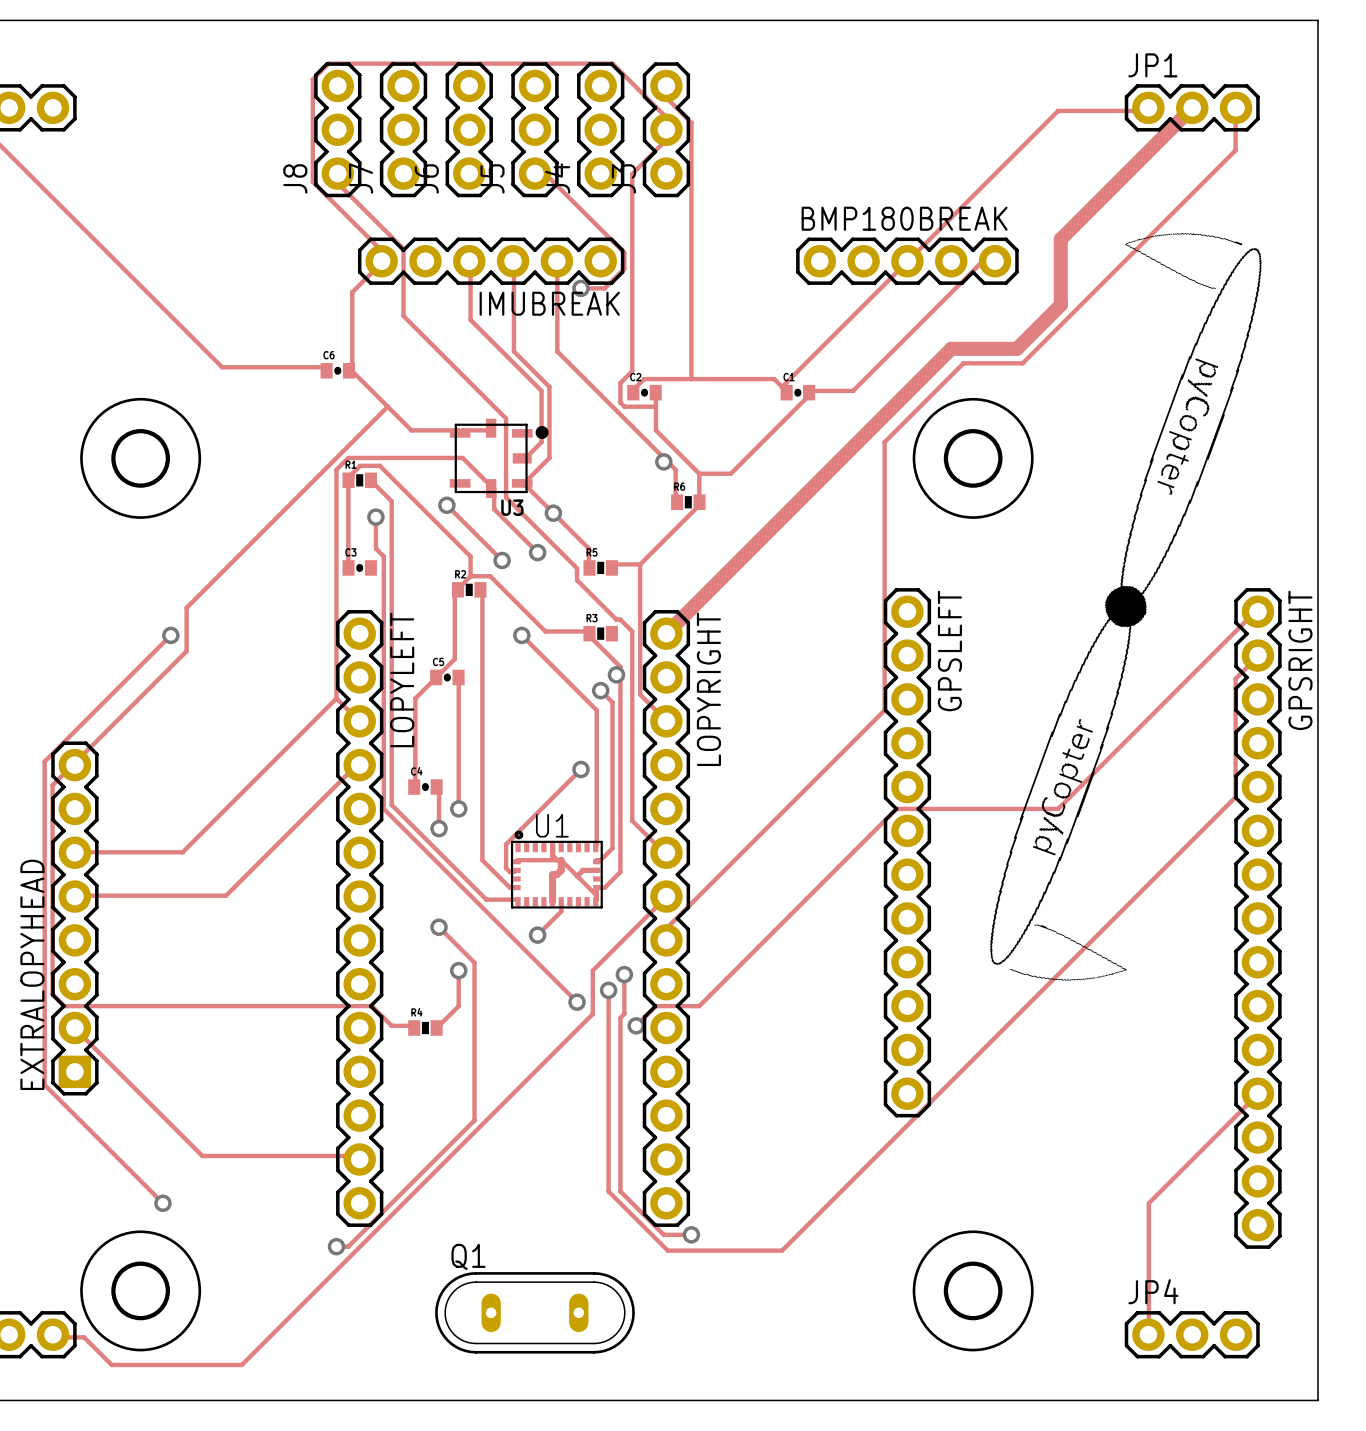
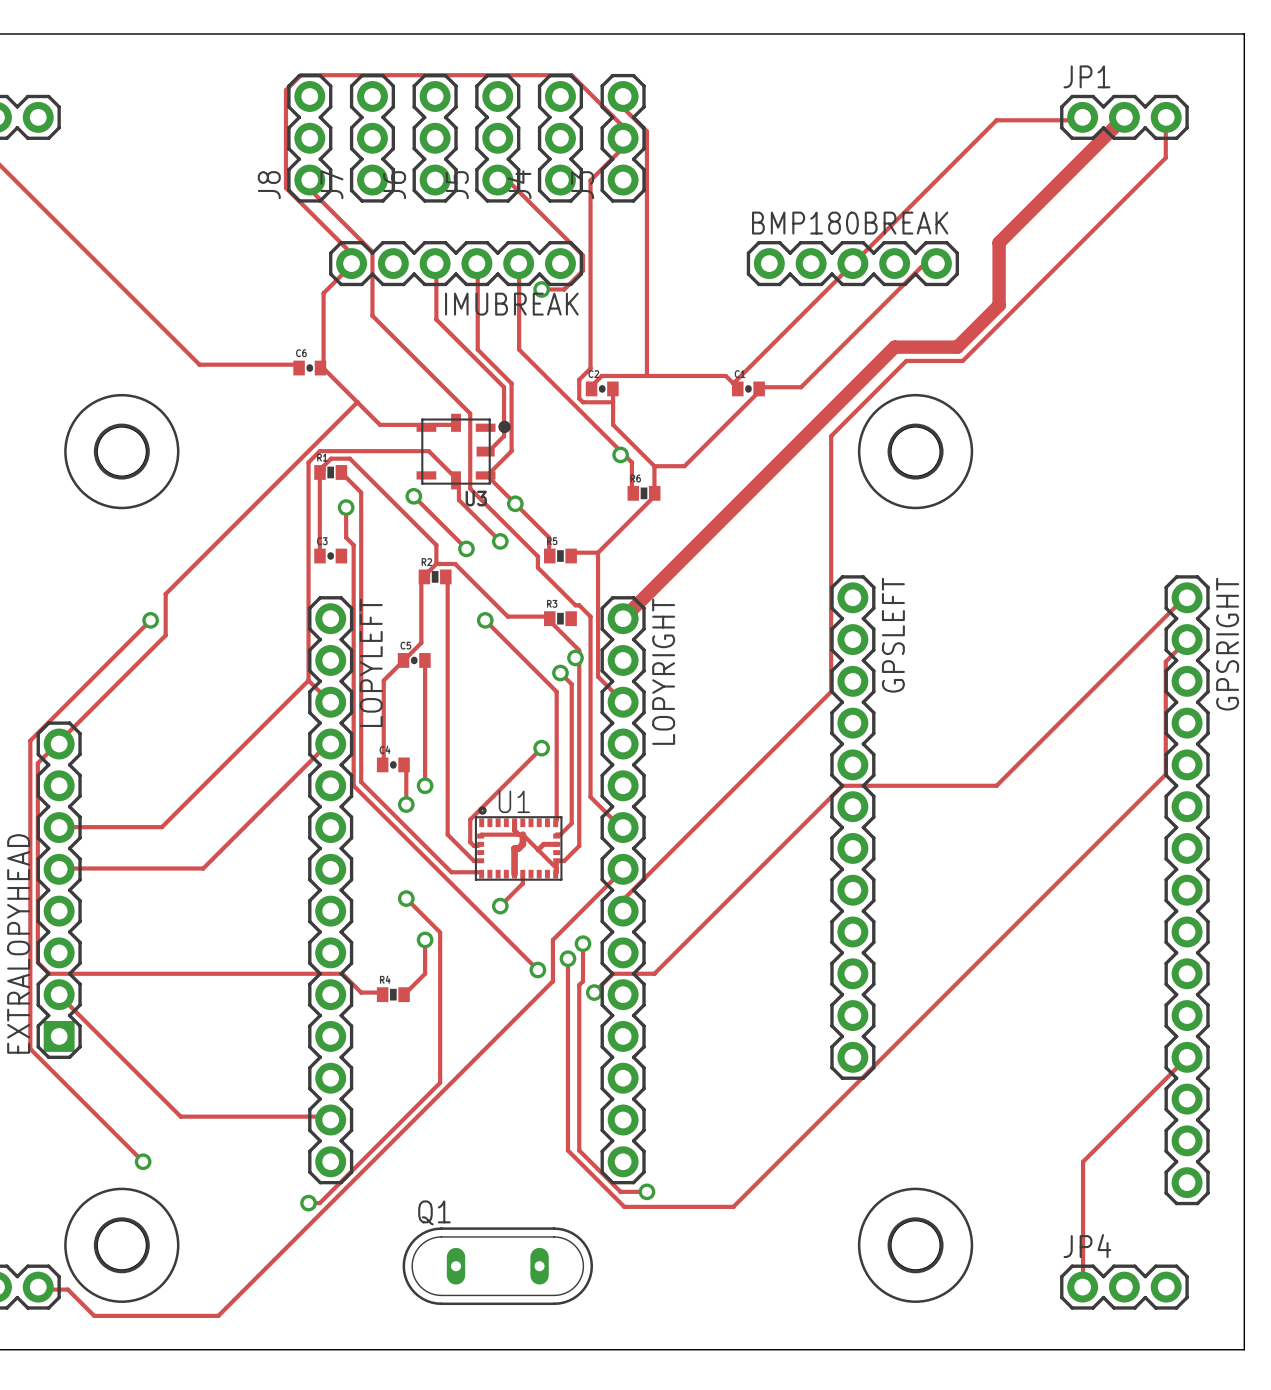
drawing: [989, 232, 1262, 981] -> none

